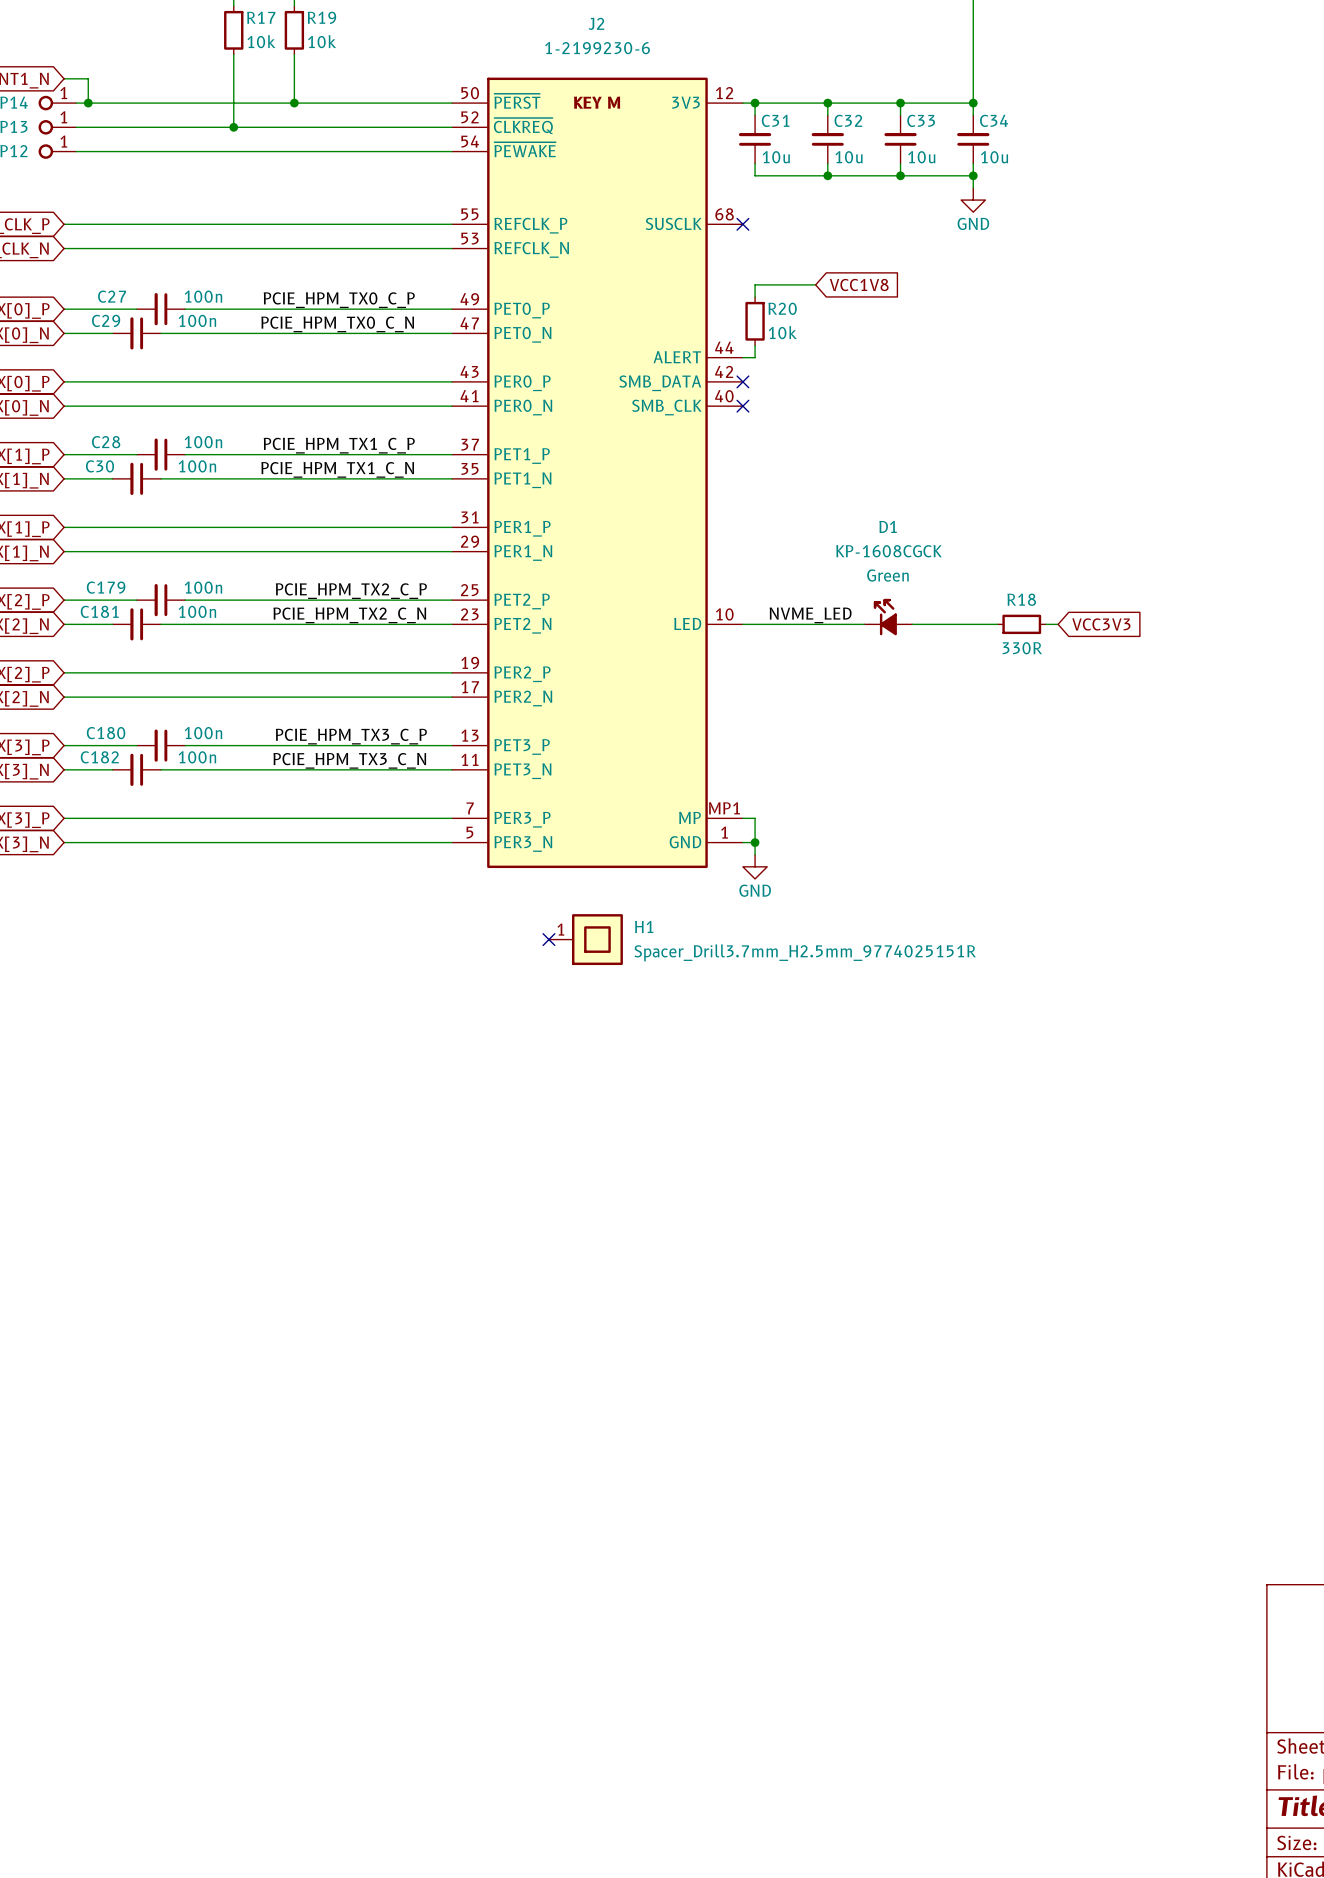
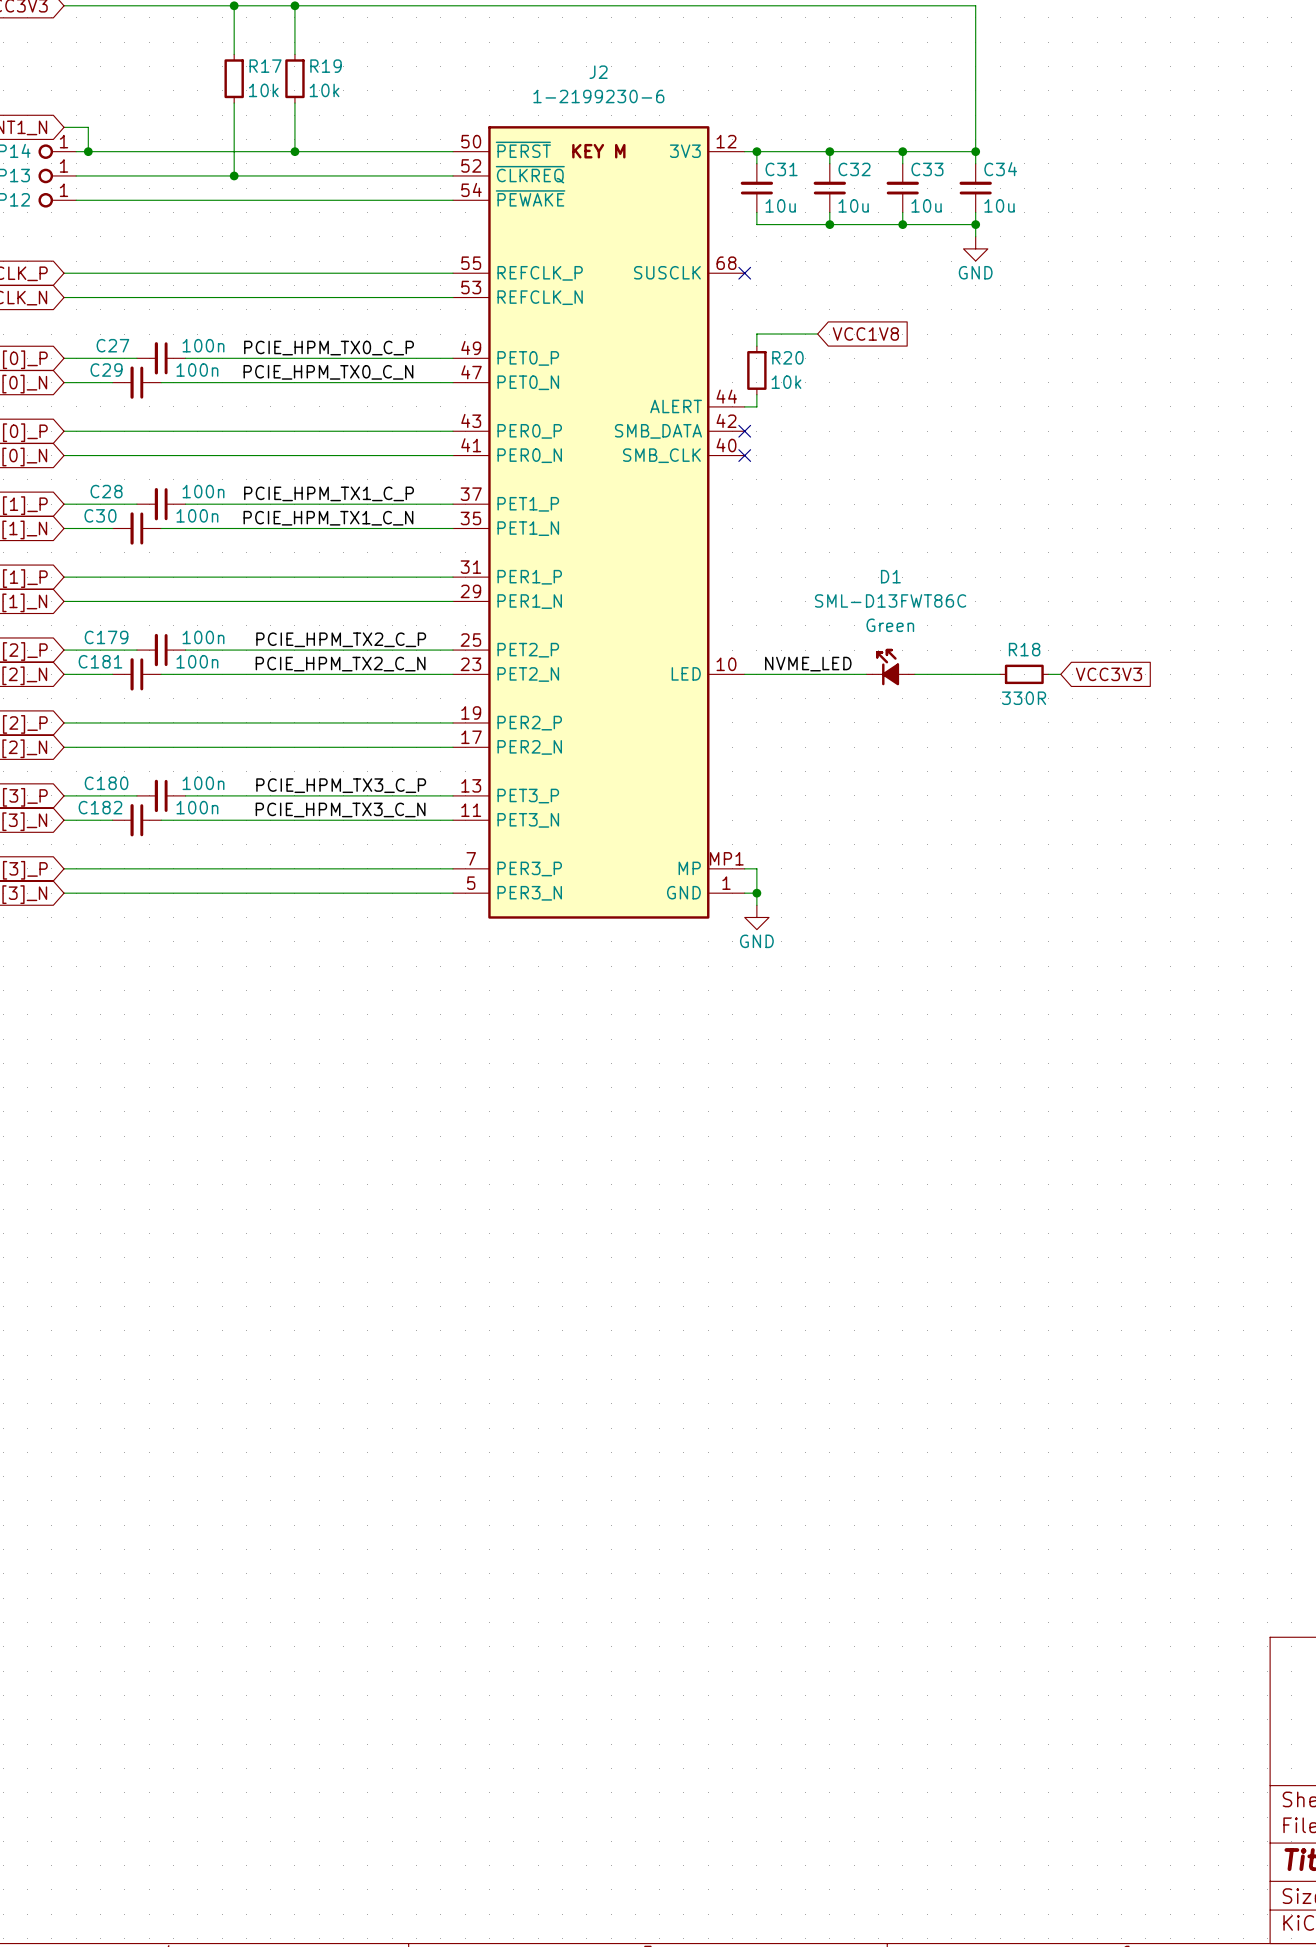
D1 text: KP-1608CGCK (889, 551) -> SML-D13FWT86C (890, 600)
no-connect mark: (548, 939) -> none
H1: Spacer_Drill3.7mm_H2.5mm_9774025151R (585, 939) -> none

